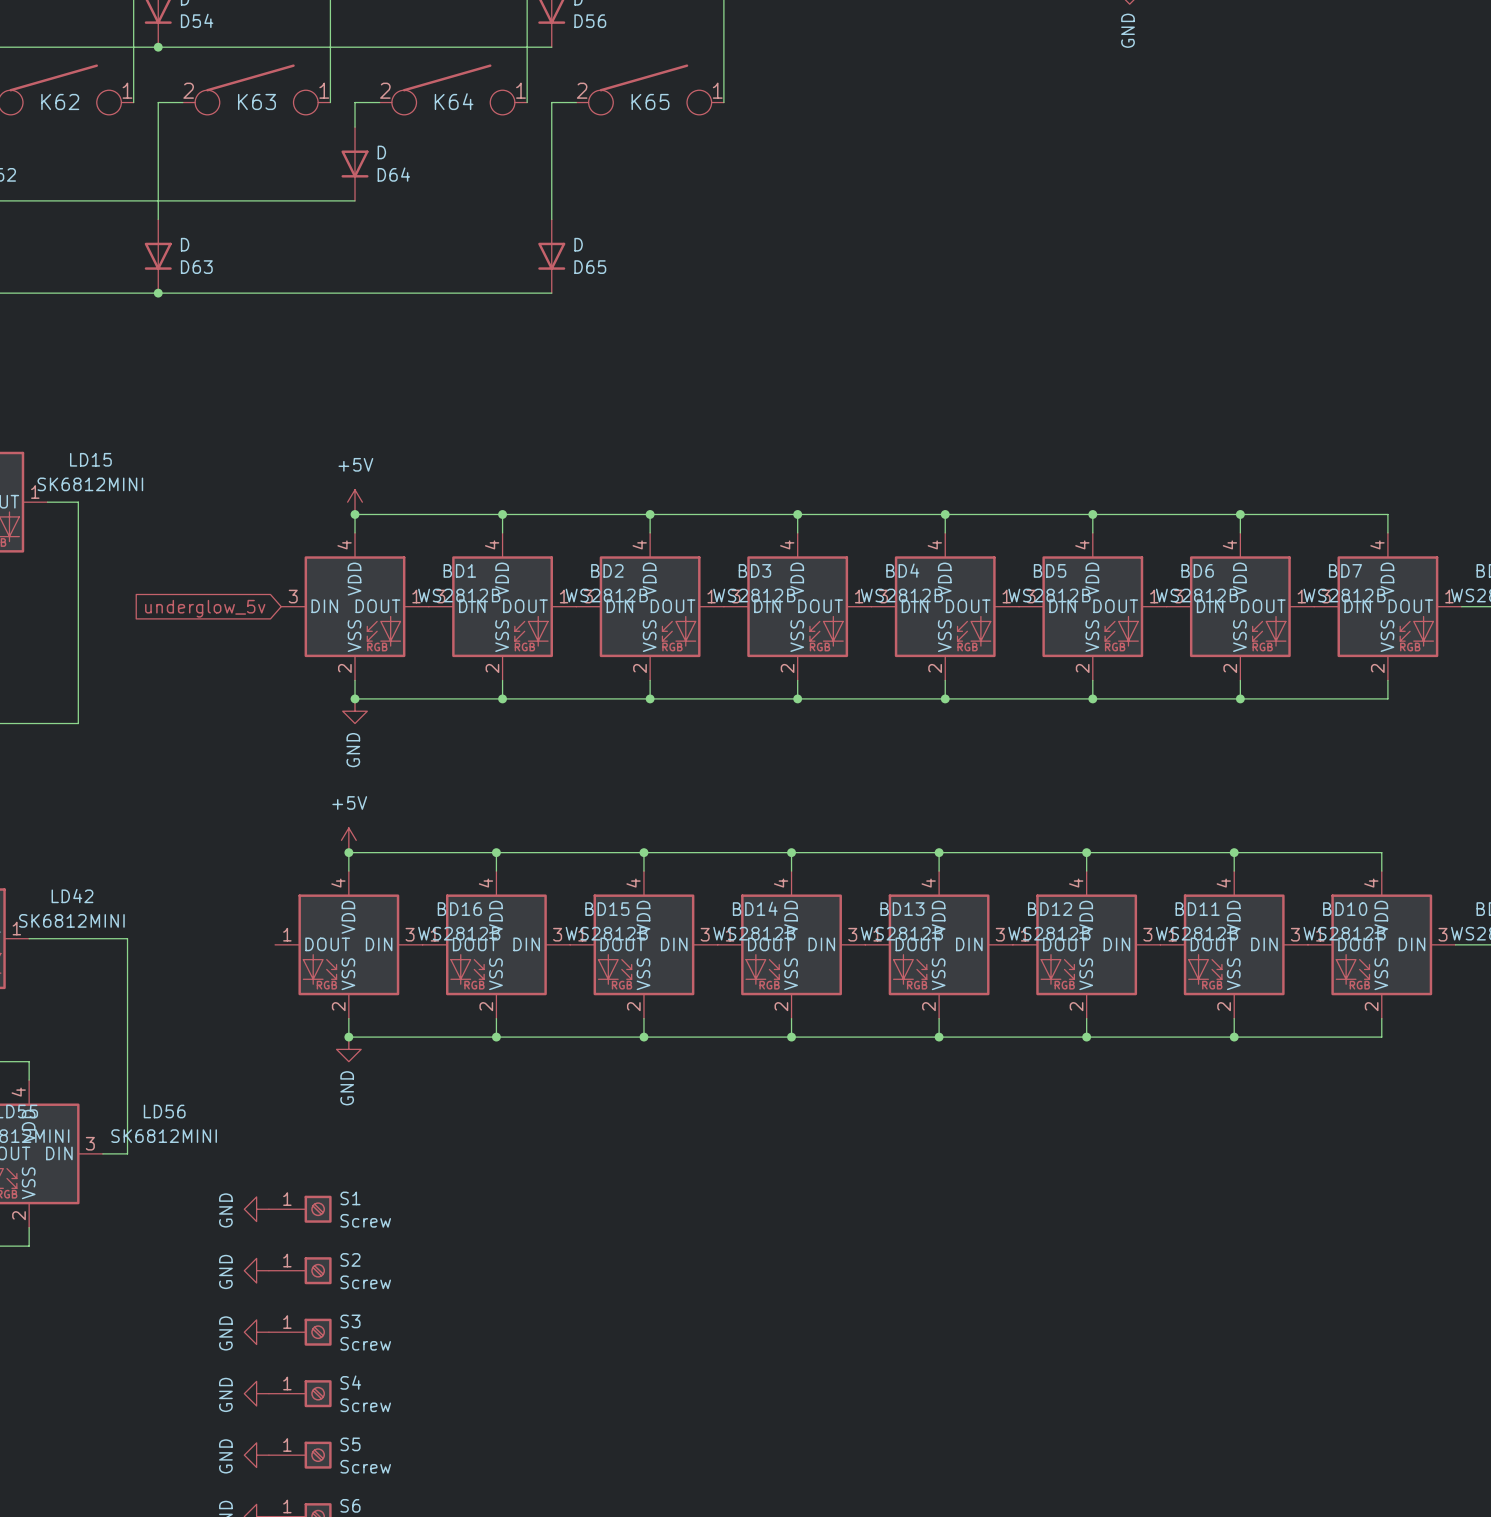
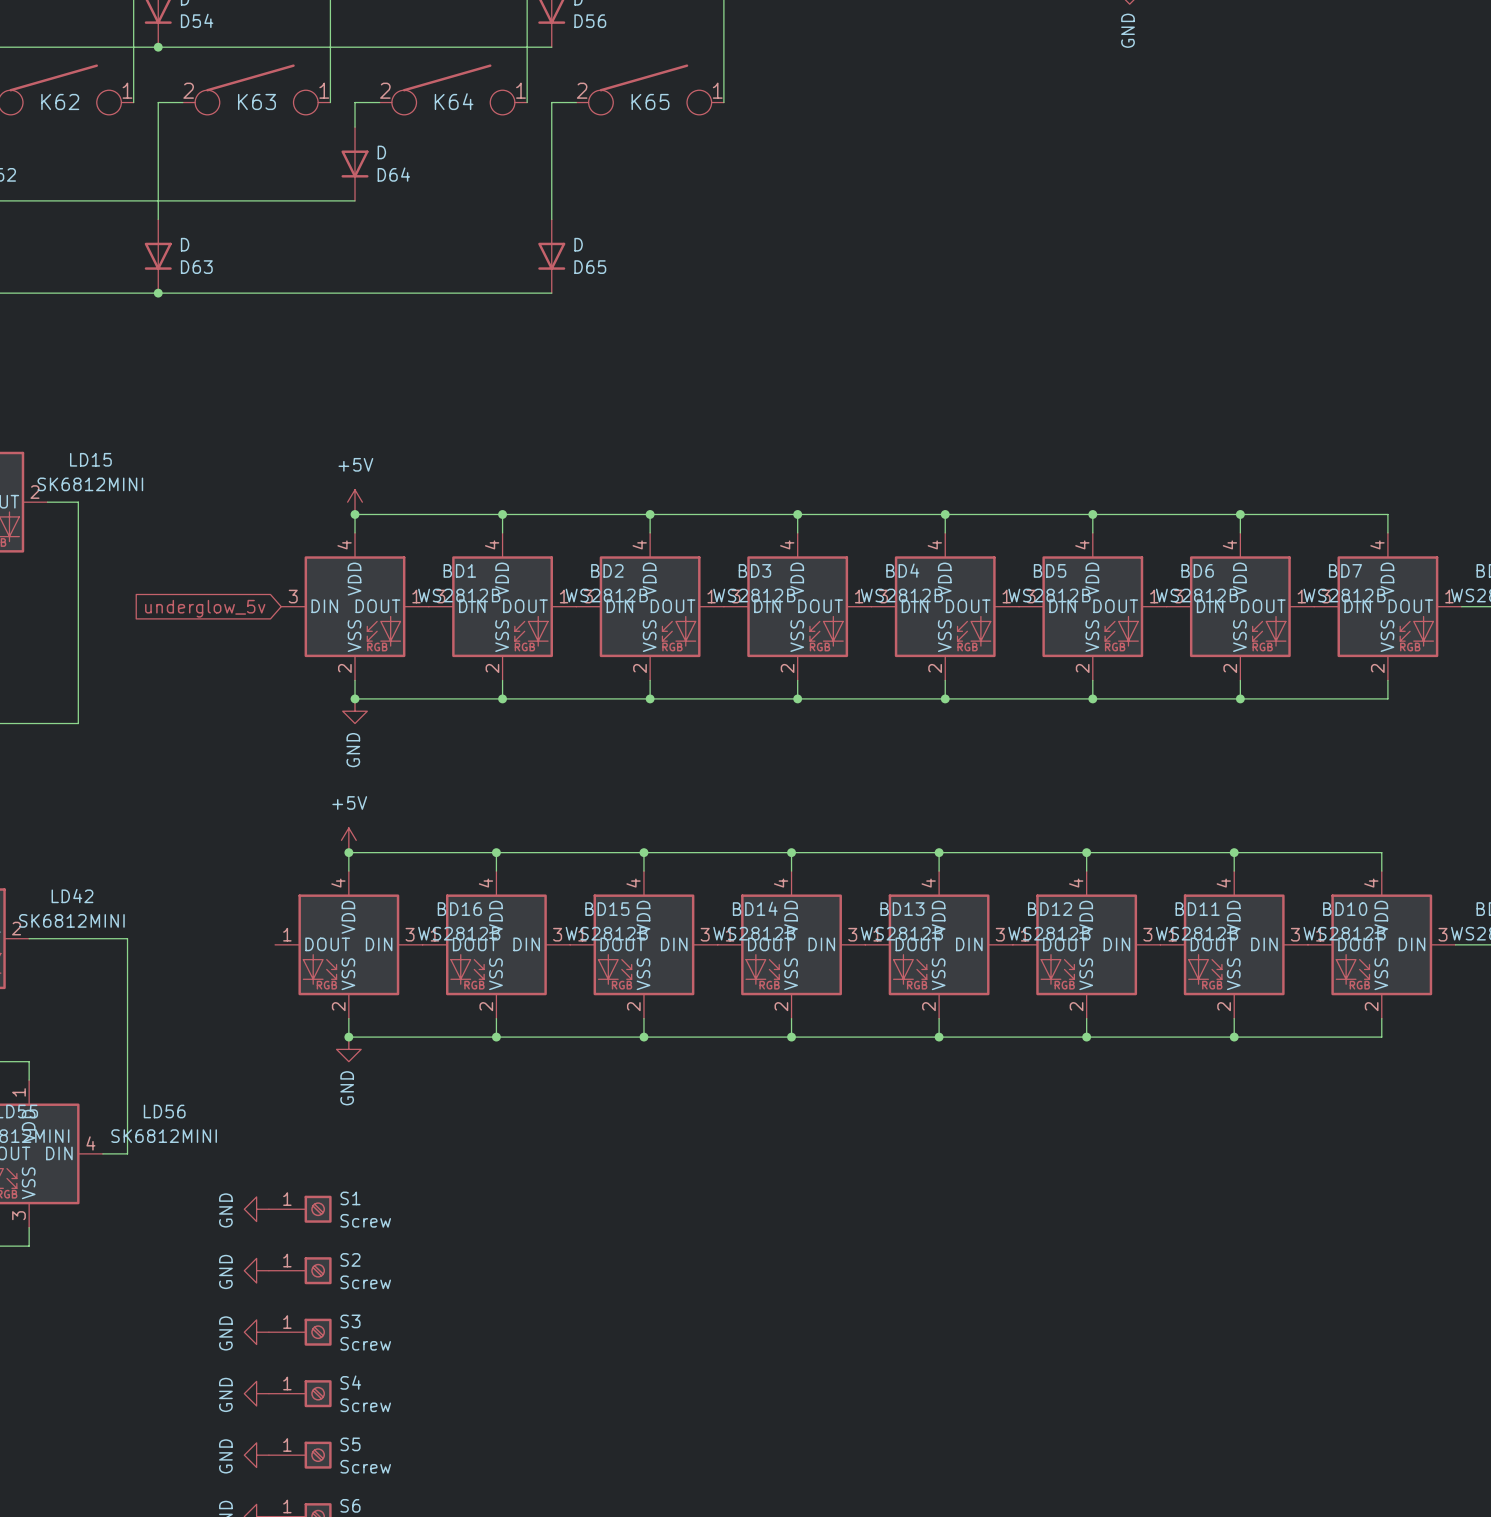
LD15 pin number: 1 (35, 492) -> 2 (35, 492)
LD42 pin number: 1 (16, 928) -> 2 (16, 928)
LD56 pin number: 4 (18, 1092) -> 1 (19, 1092)
LD56 pin number: 3 (90, 1143) -> 4 (90, 1143)
LD56 pin number: 2 (19, 1215) -> 3 (19, 1215)

